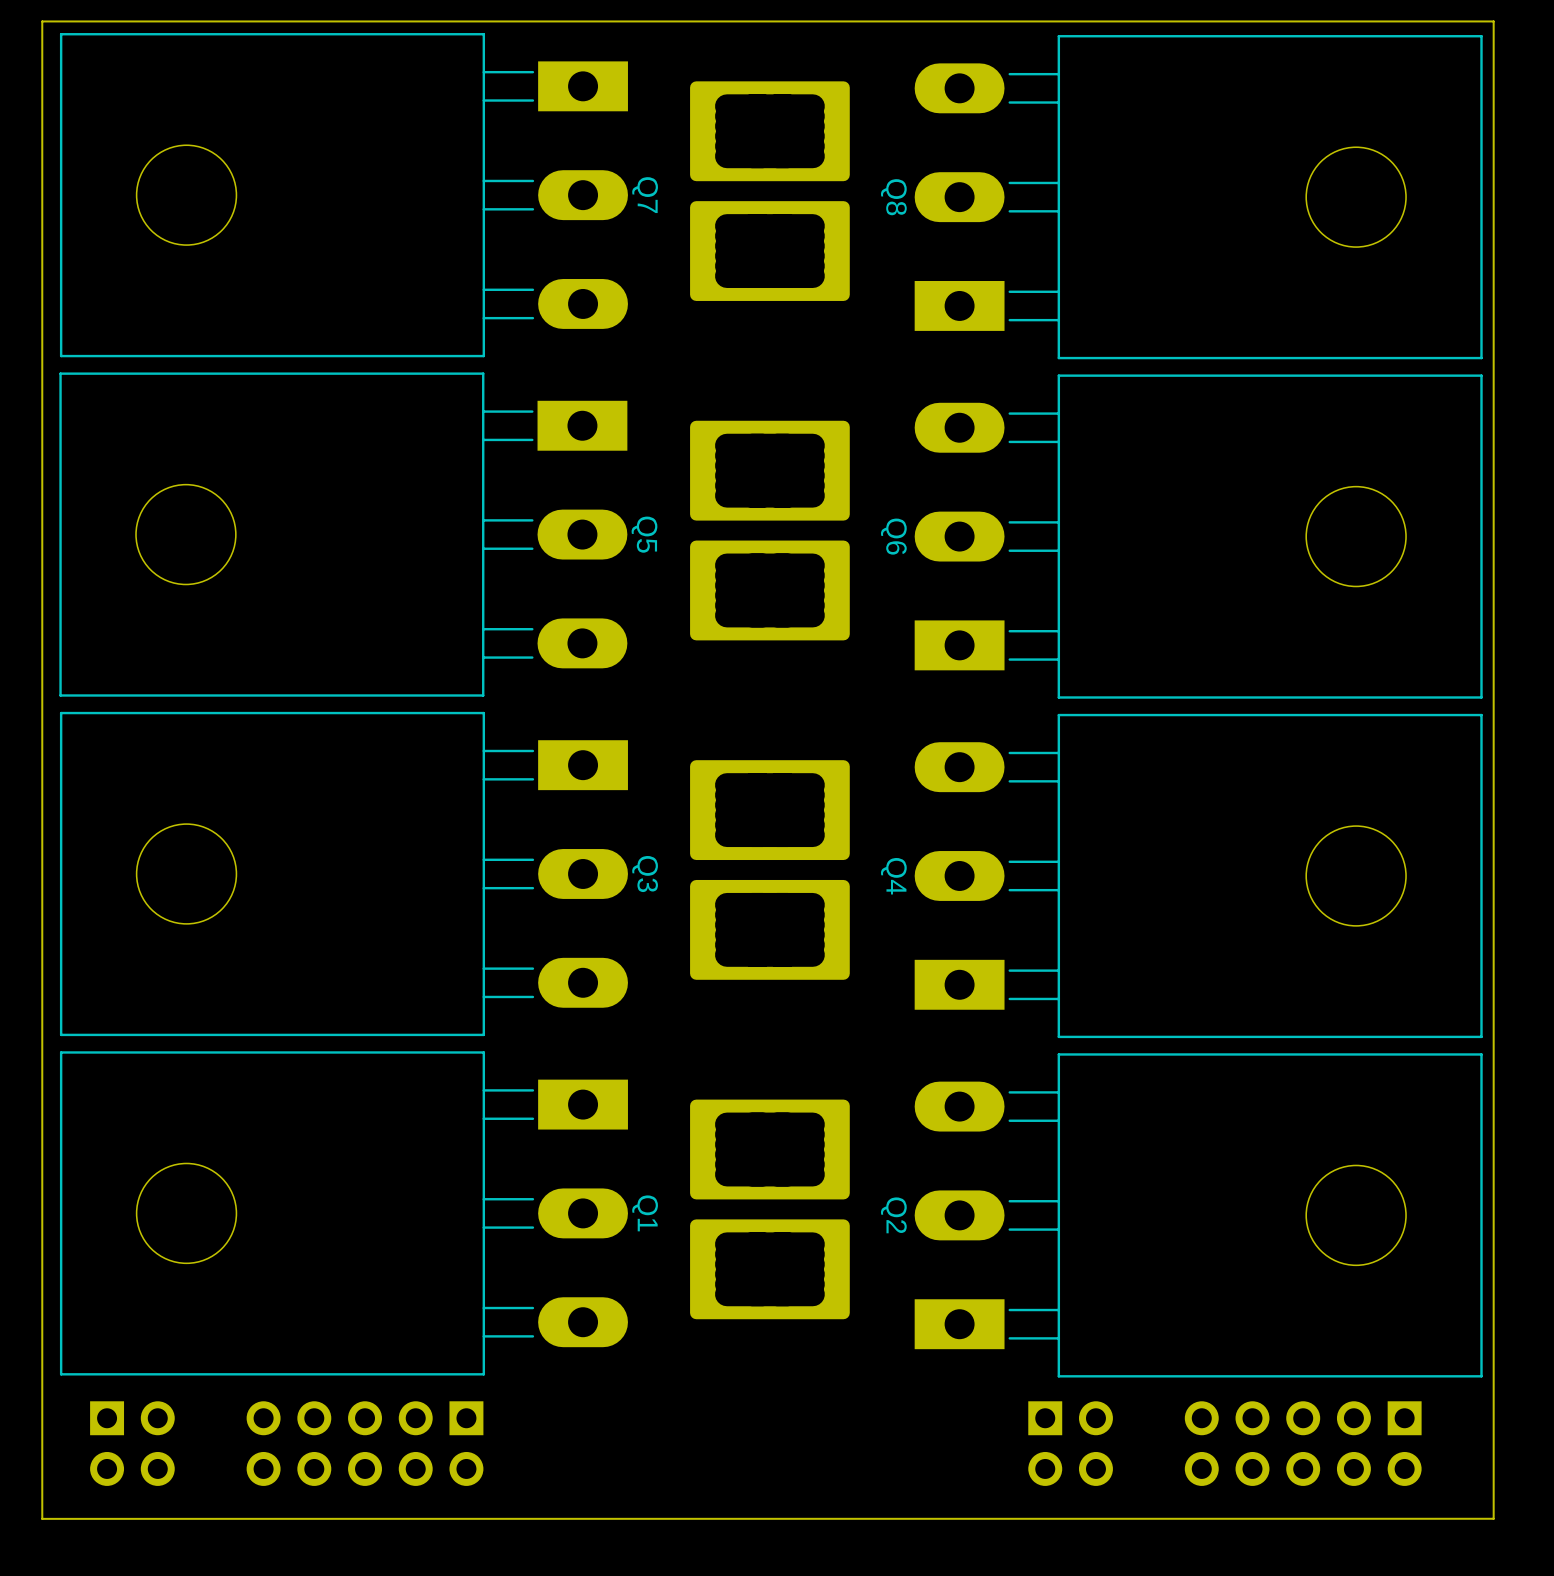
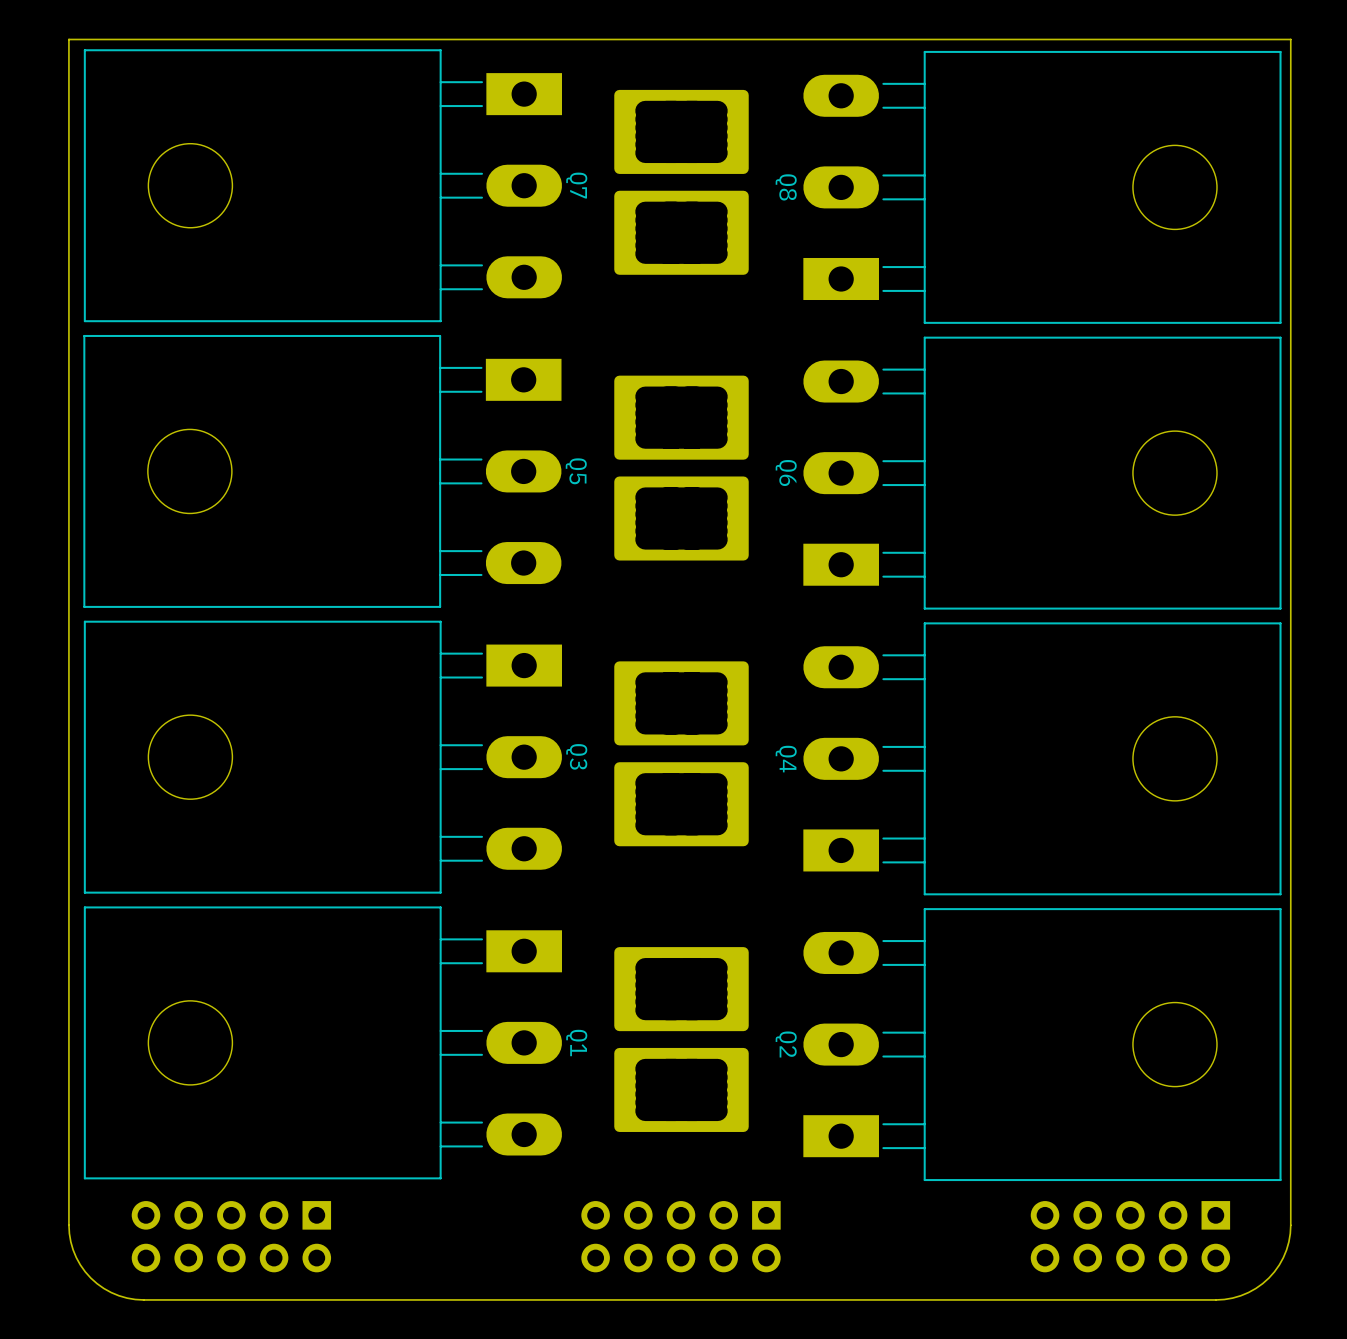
board edge: (1493, 1430) (1493, 1518) (42, 1518) (42, 1430) -> (1290, 1225) (1286, 1249) (1279, 1265) (1268, 1278) (1255, 1288) (1240, 1295) (1216, 1299) (135, 1299) (111, 1292) (97, 1283) (85, 1271) (73, 1249) (68, 1225)
part: (132, 1443) -> none
part position: (365, 1443) -> (231, 1236)
part: none -> (681, 1236)
part: (1070, 1443) -> none

